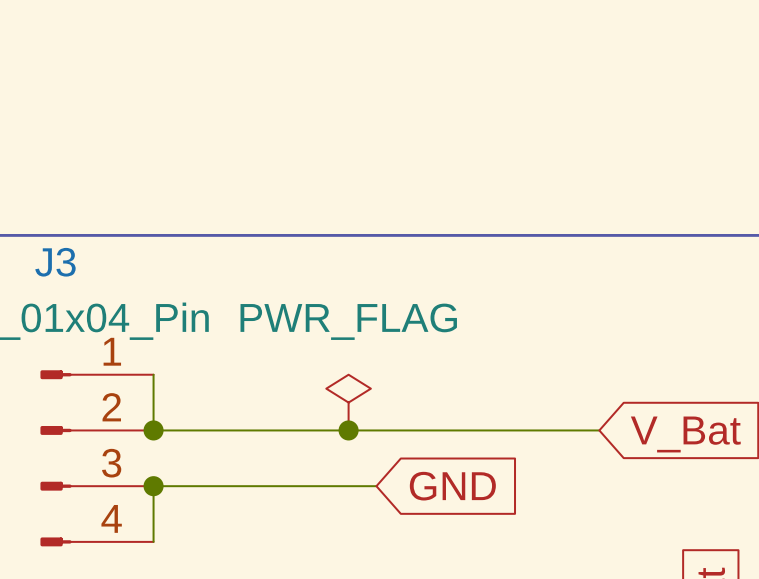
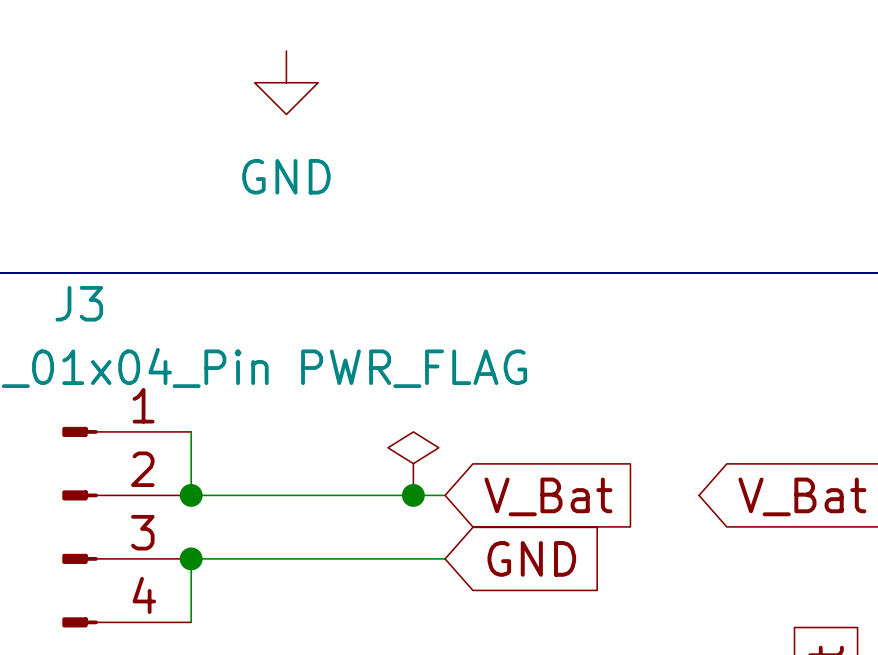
power symbol: none -> GND (286, 82)
wire: (376, 430) (599, 430) -> none
global label: none -> V_Bat (548, 496)

